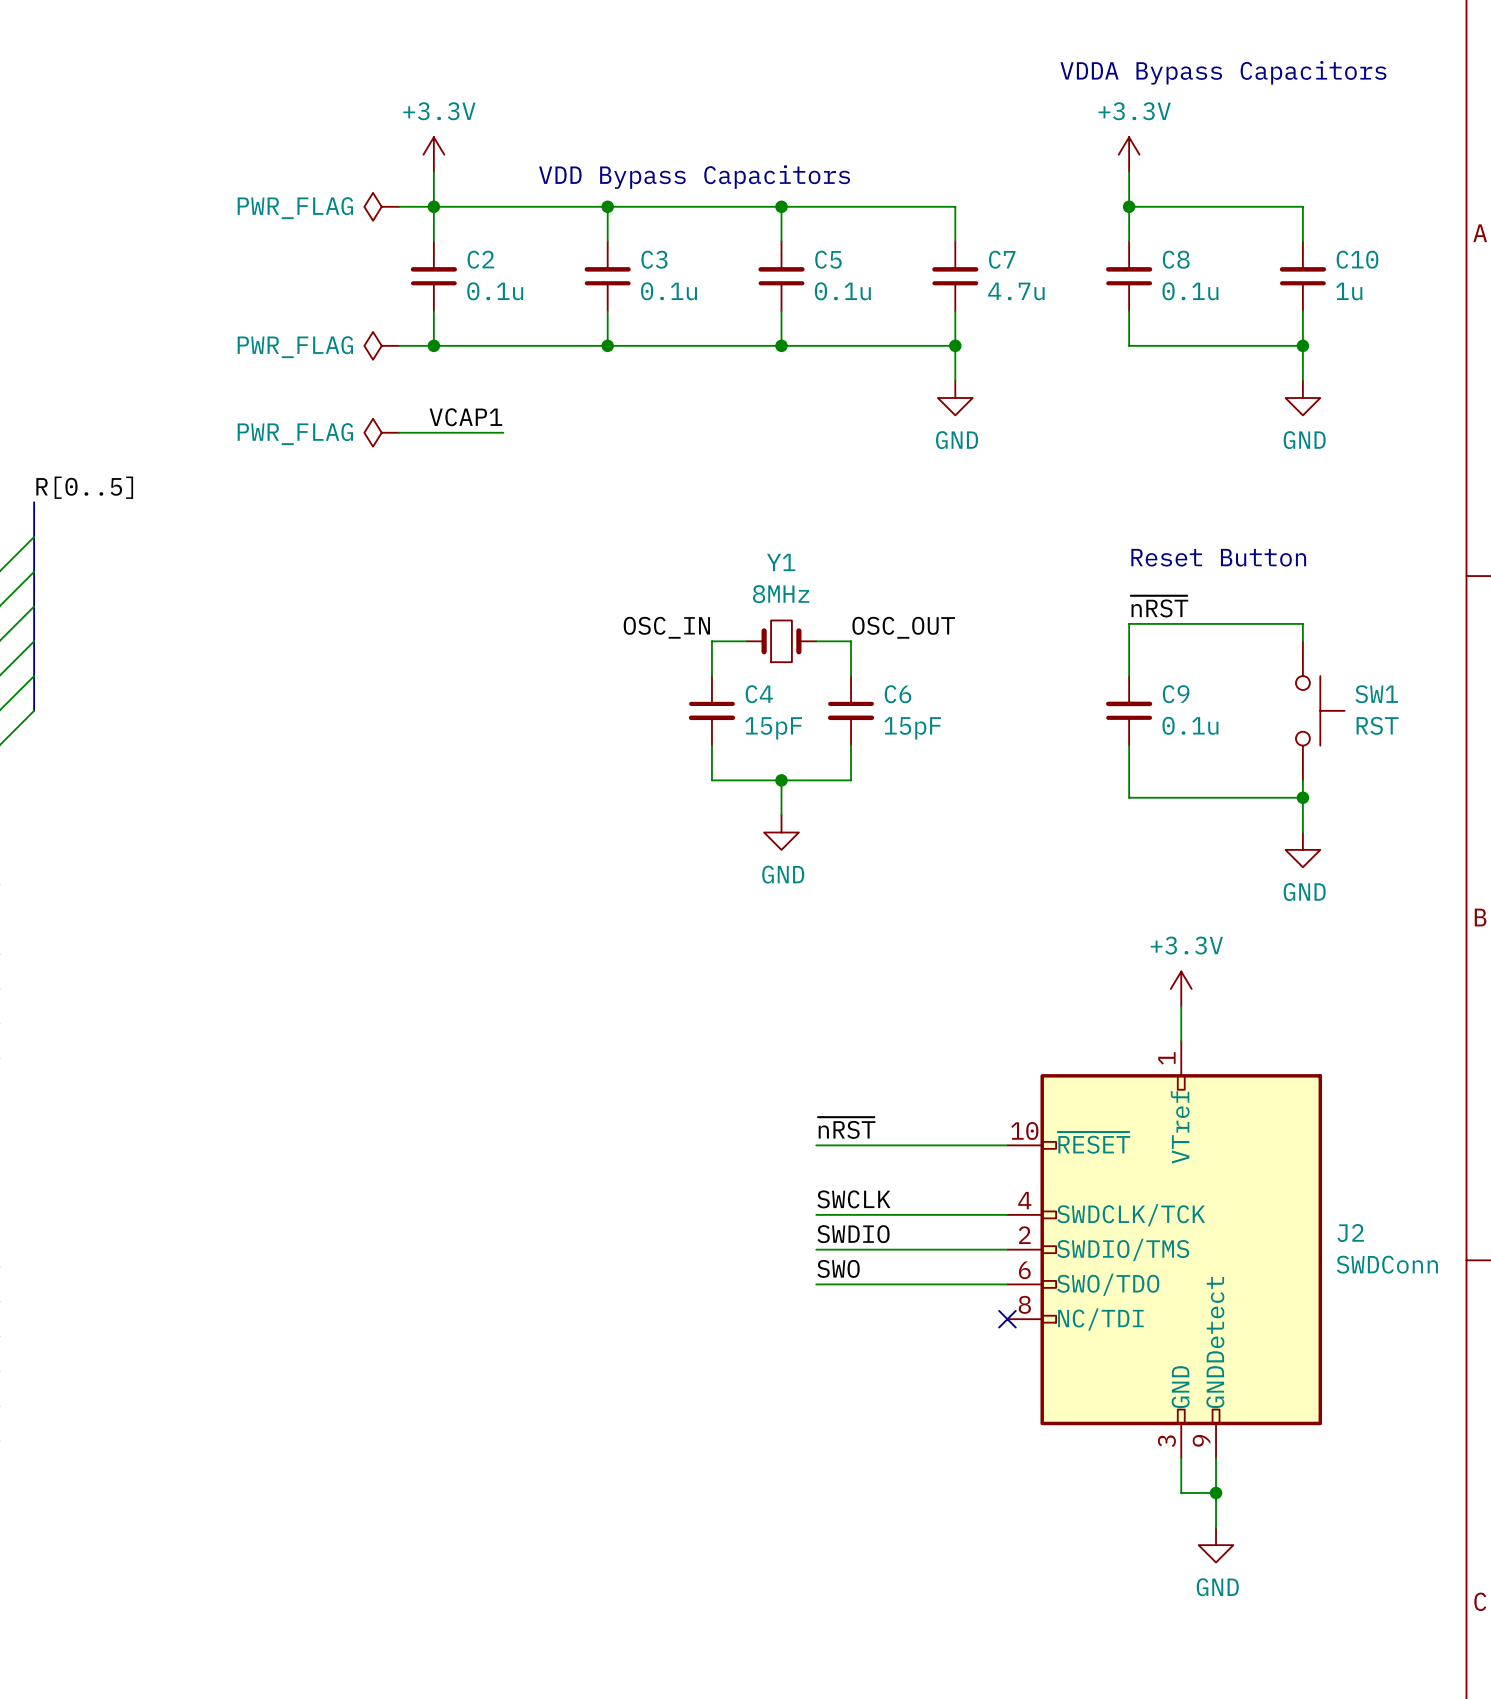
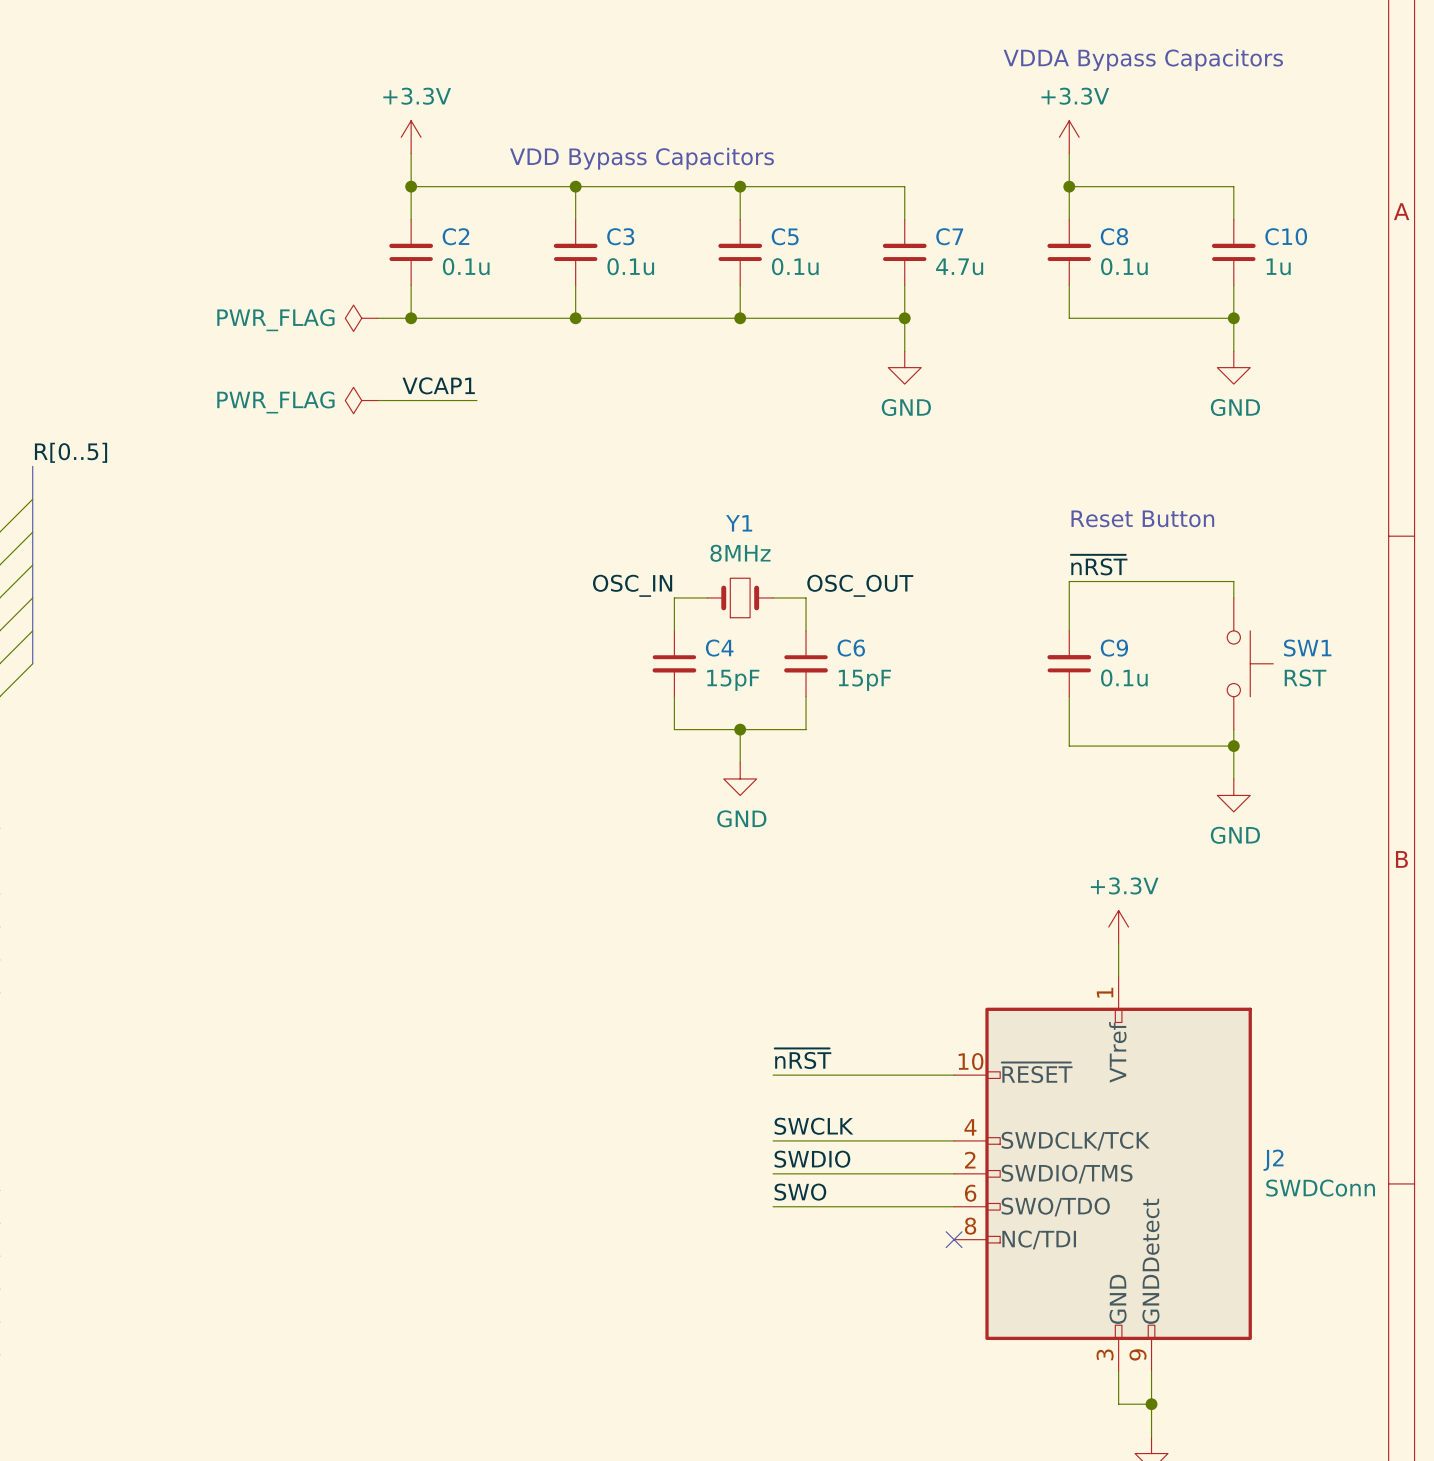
power symbol: PWR_FLAG (381, 206) -> none
wire: (399, 206) (433, 206) -> none

